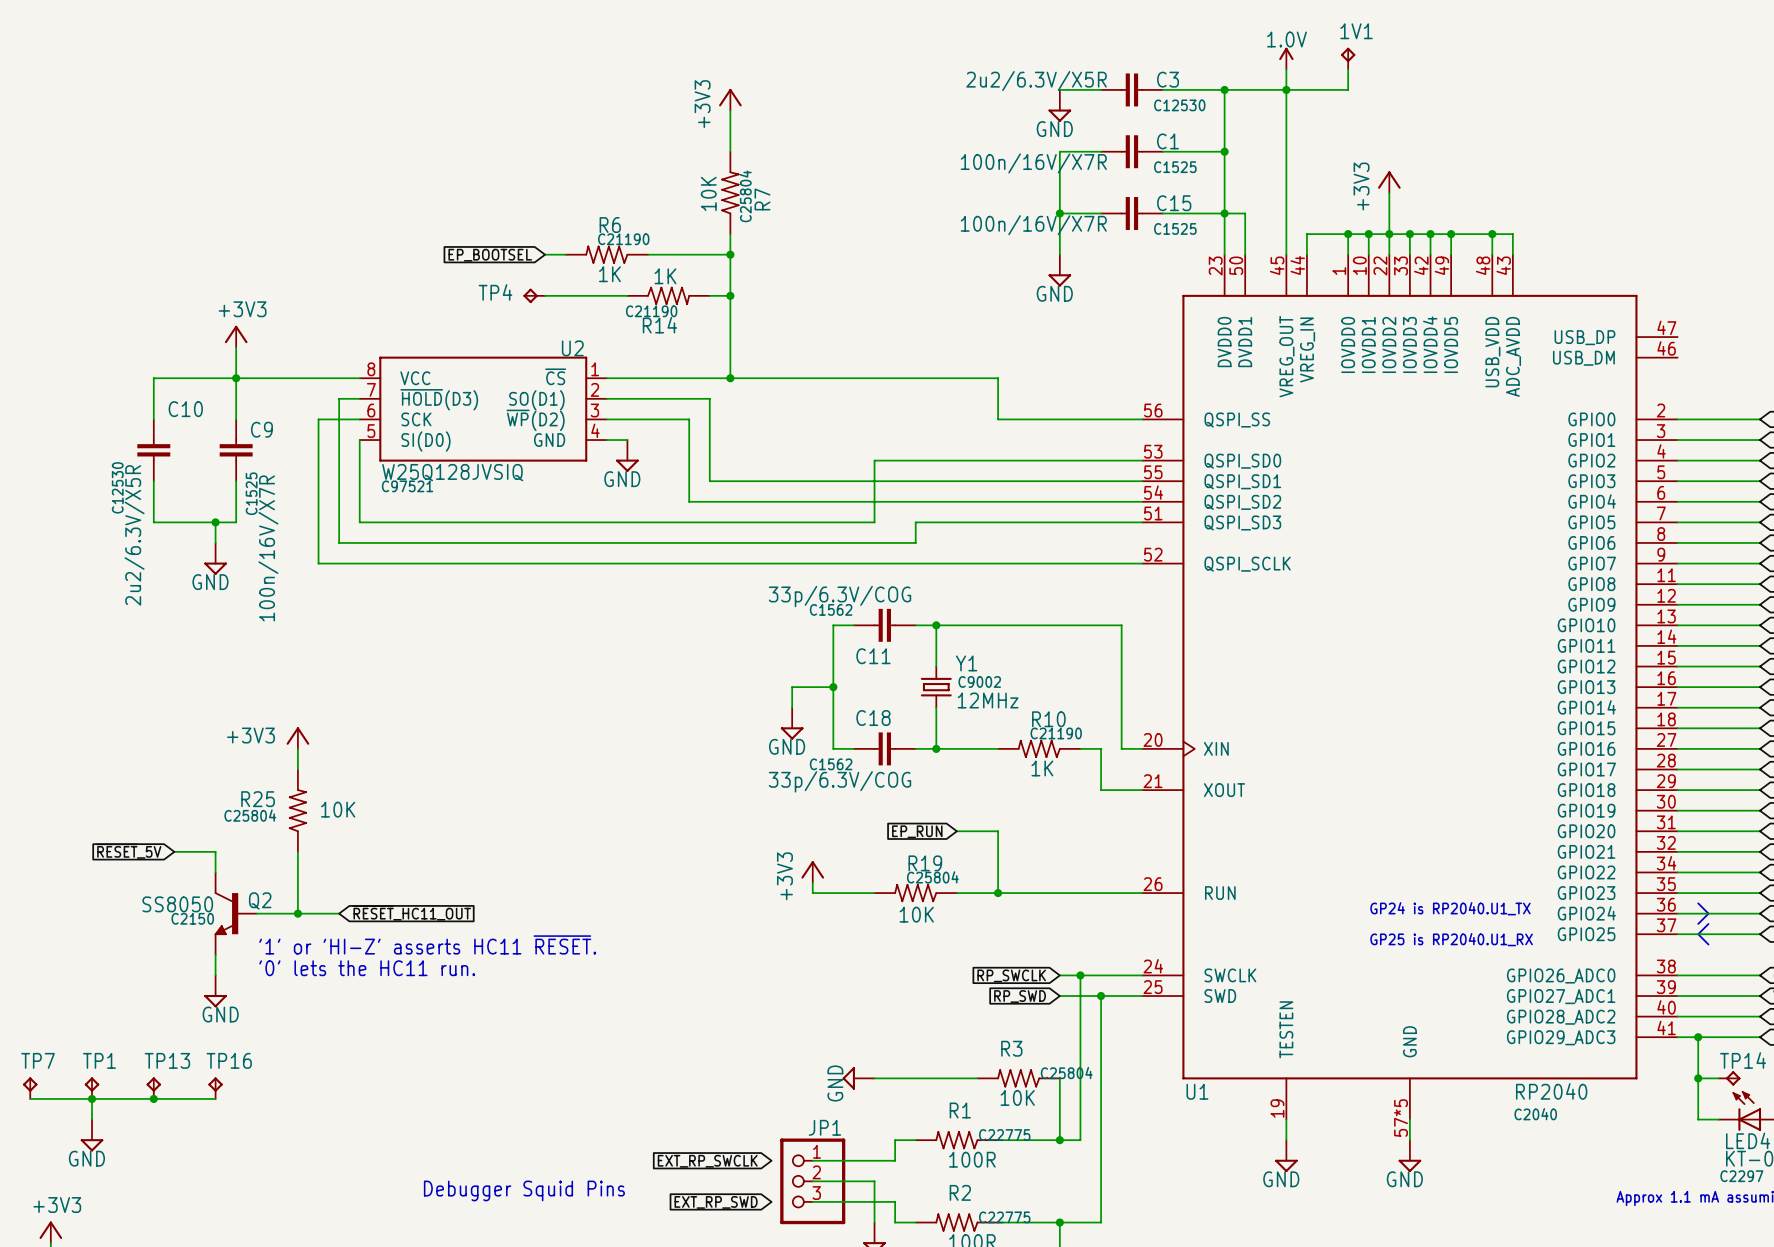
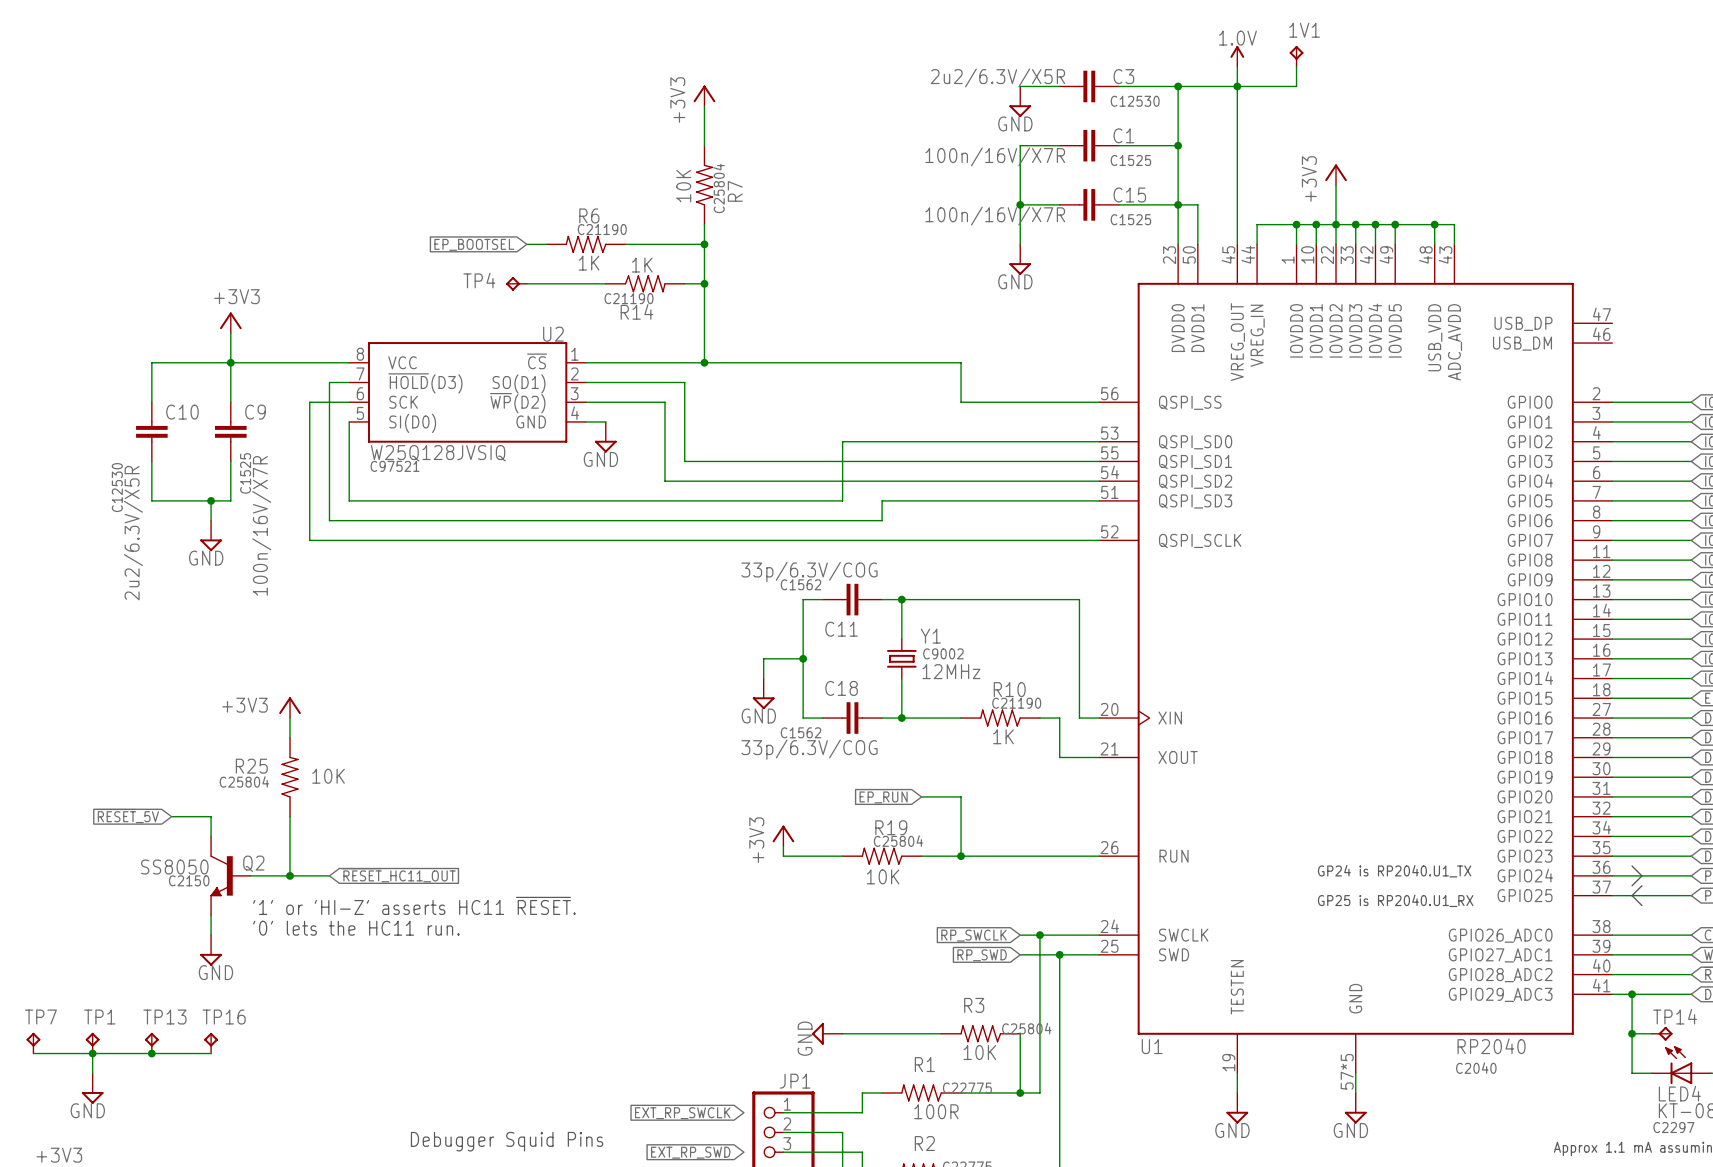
C10 name position: C10 (185, 409) -> C10 (182, 412)
C10 text position: C12530 (117, 487) -> C12530 (117, 487)
C10 value position: 2u2/6.3V/X5R (134, 535) -> 2u2/6.3V/X5R (133, 533)

